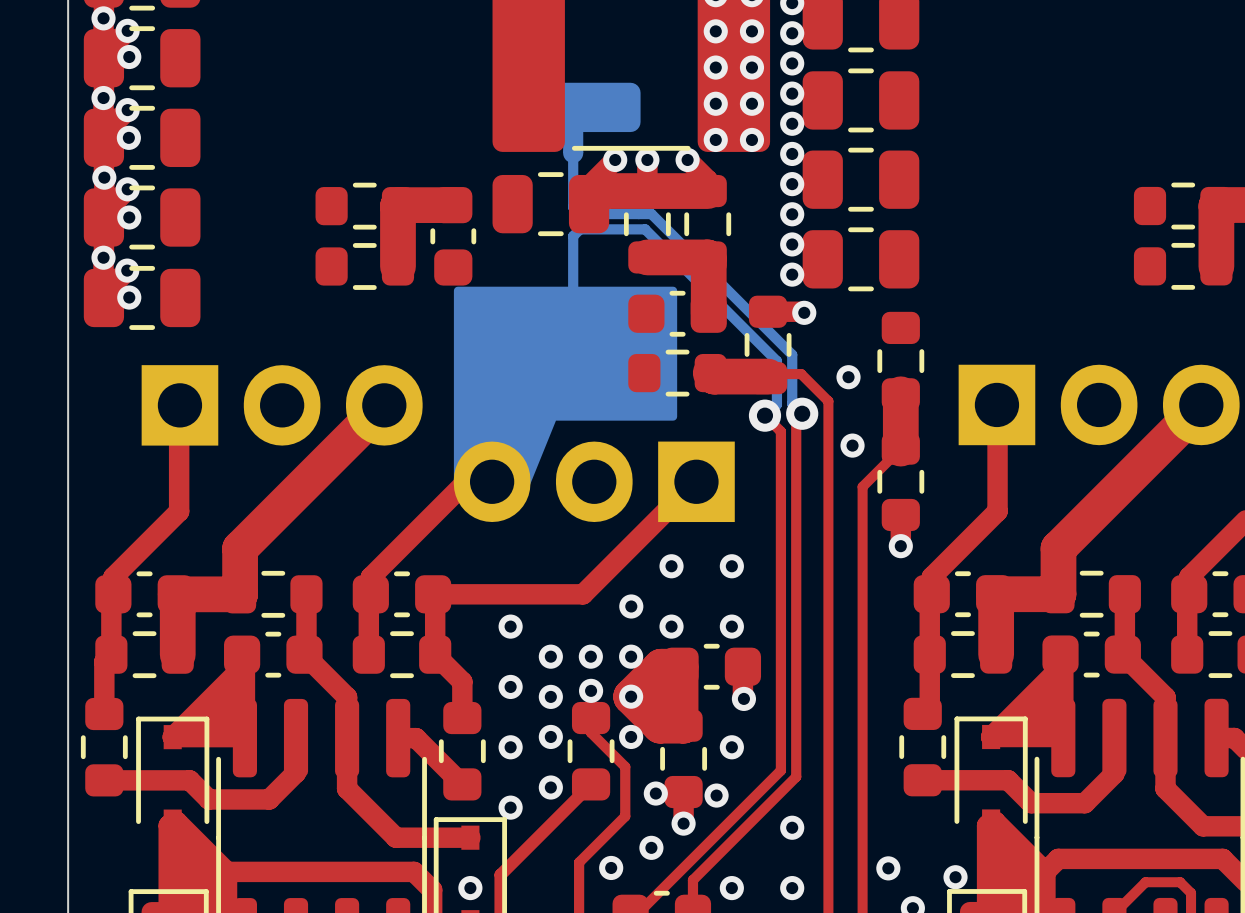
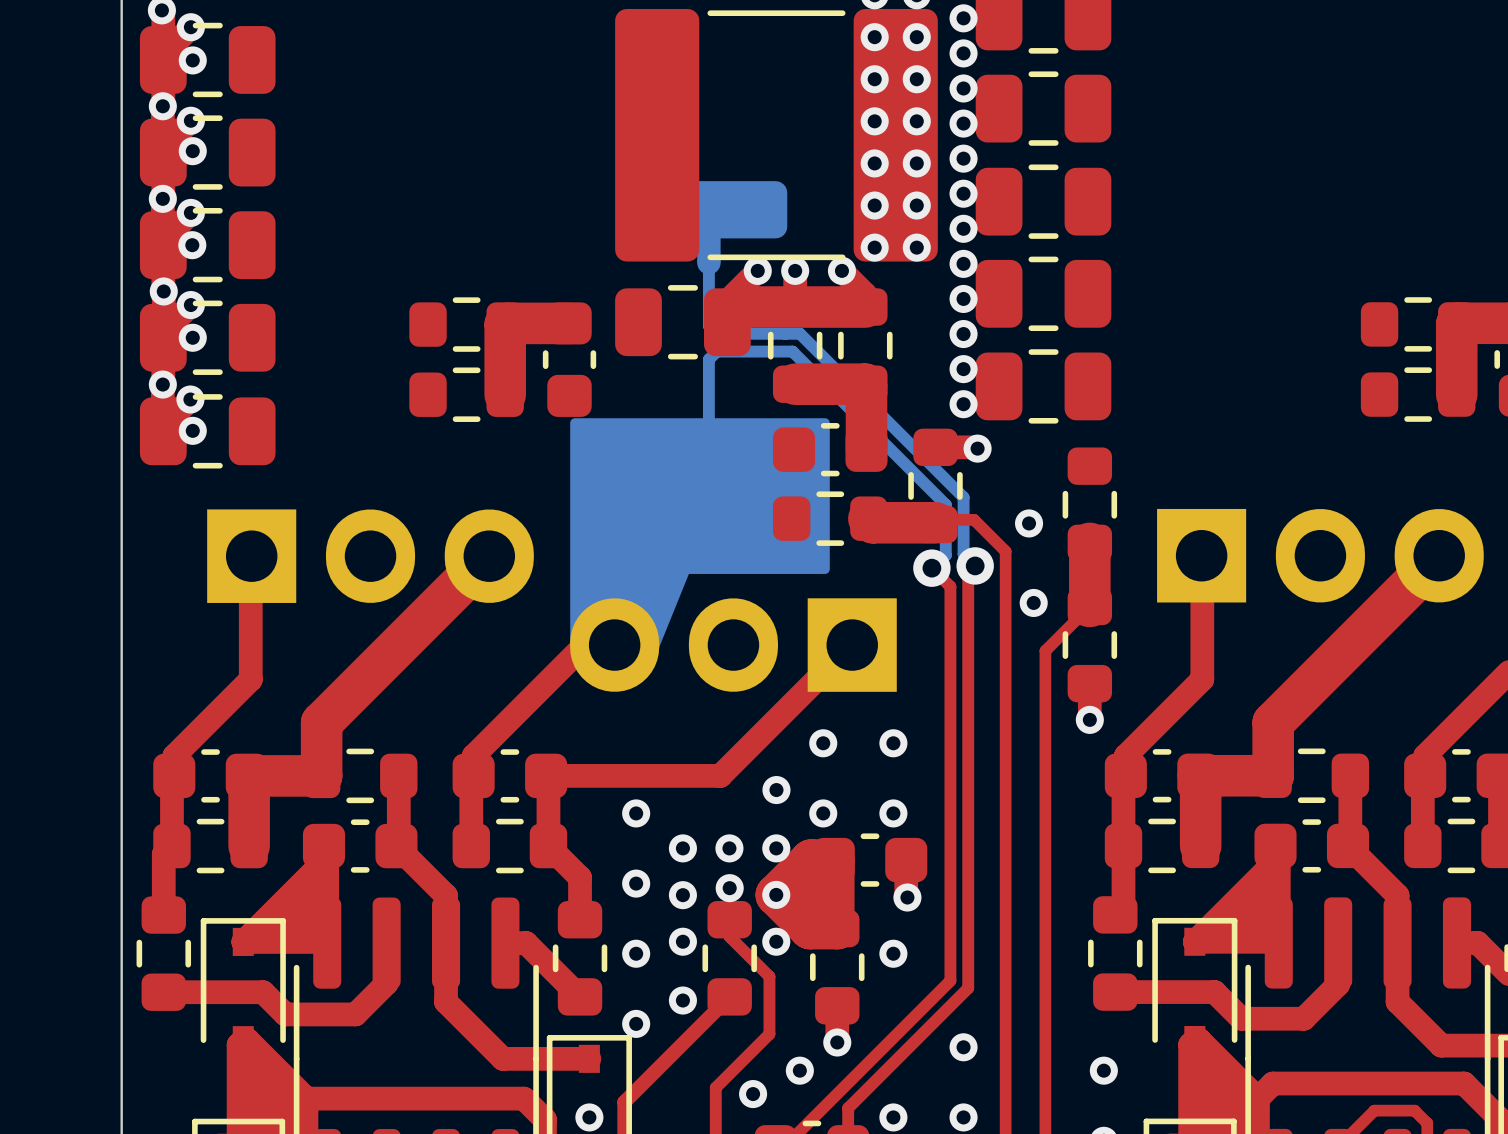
via: (655, 793) -> none
via: (716, 795) -> none
via: none -> (1103, 1070)
via: (888, 868) -> none
via: (955, 877) -> none

